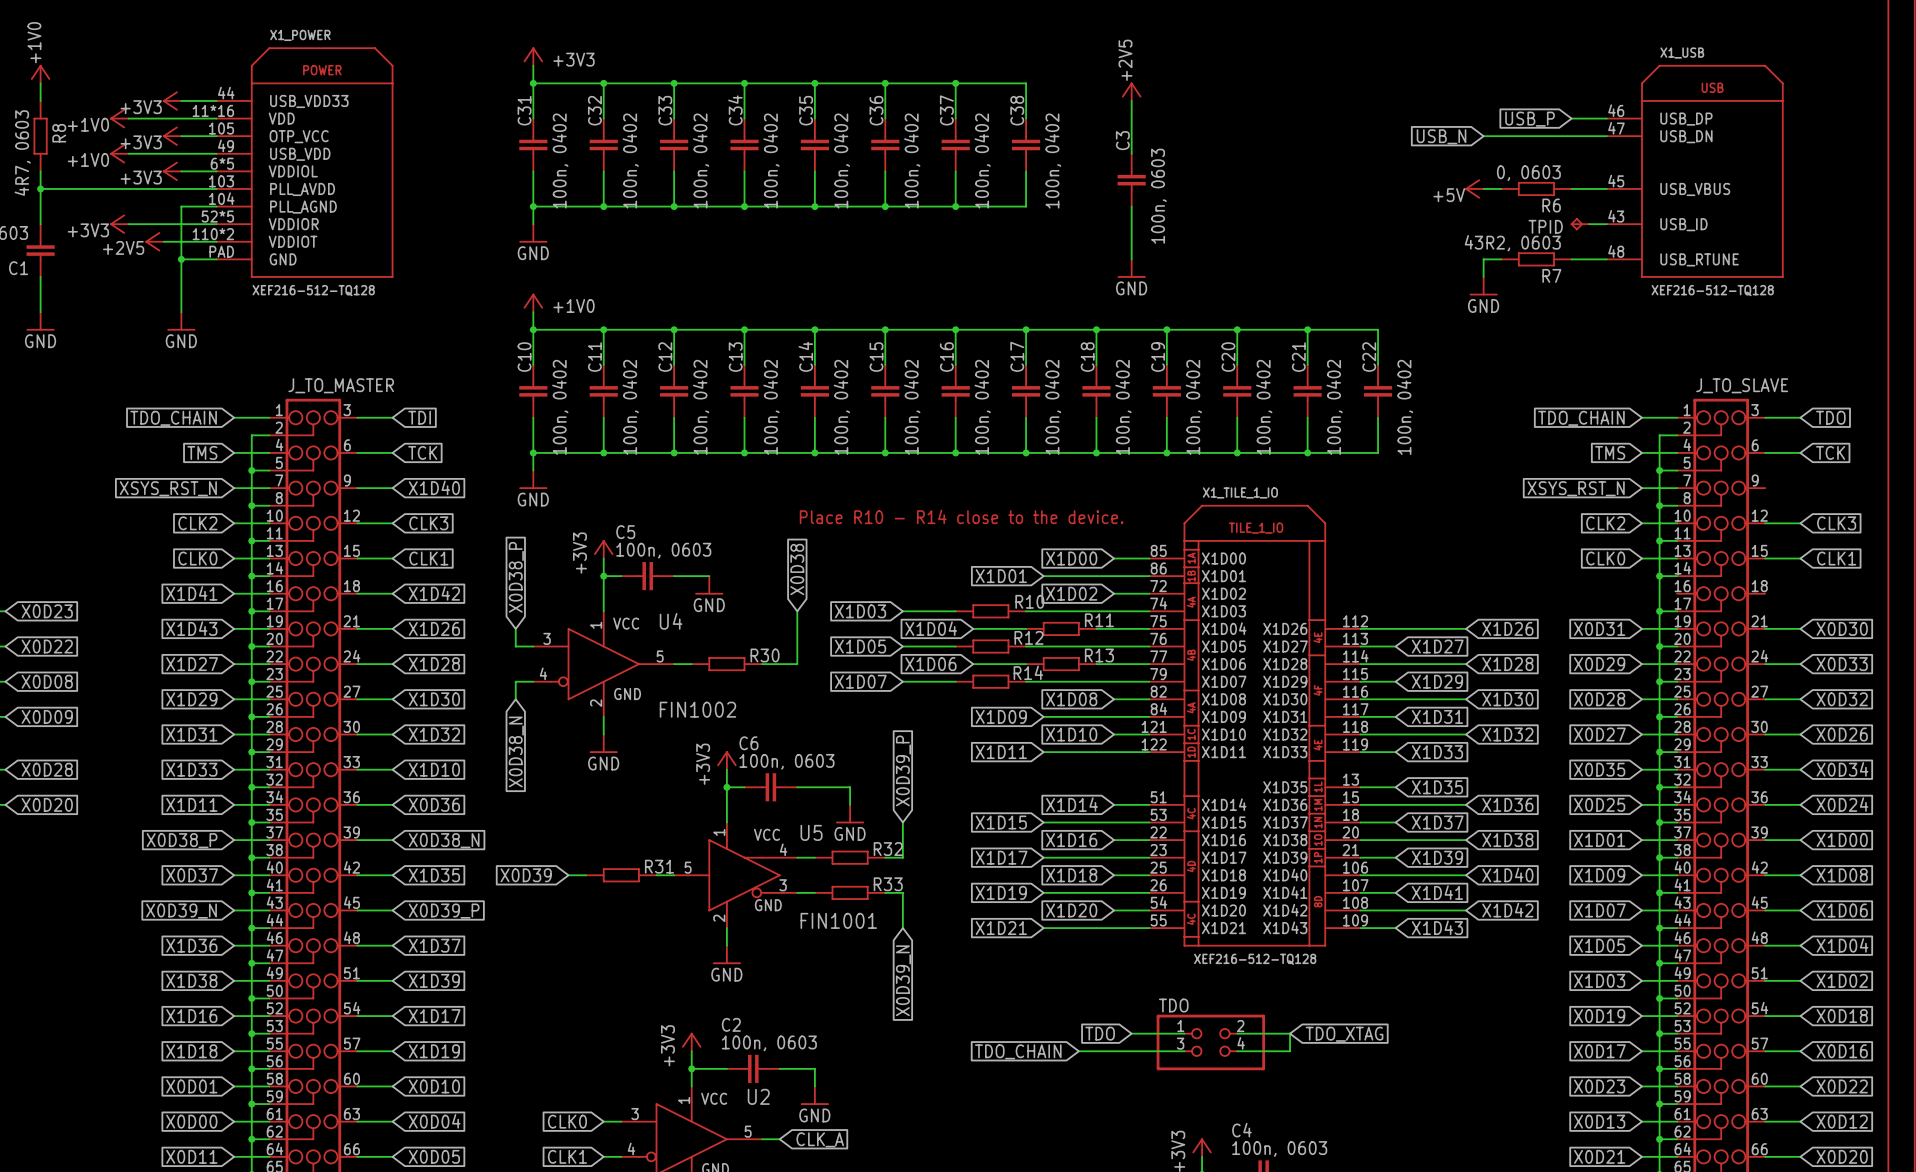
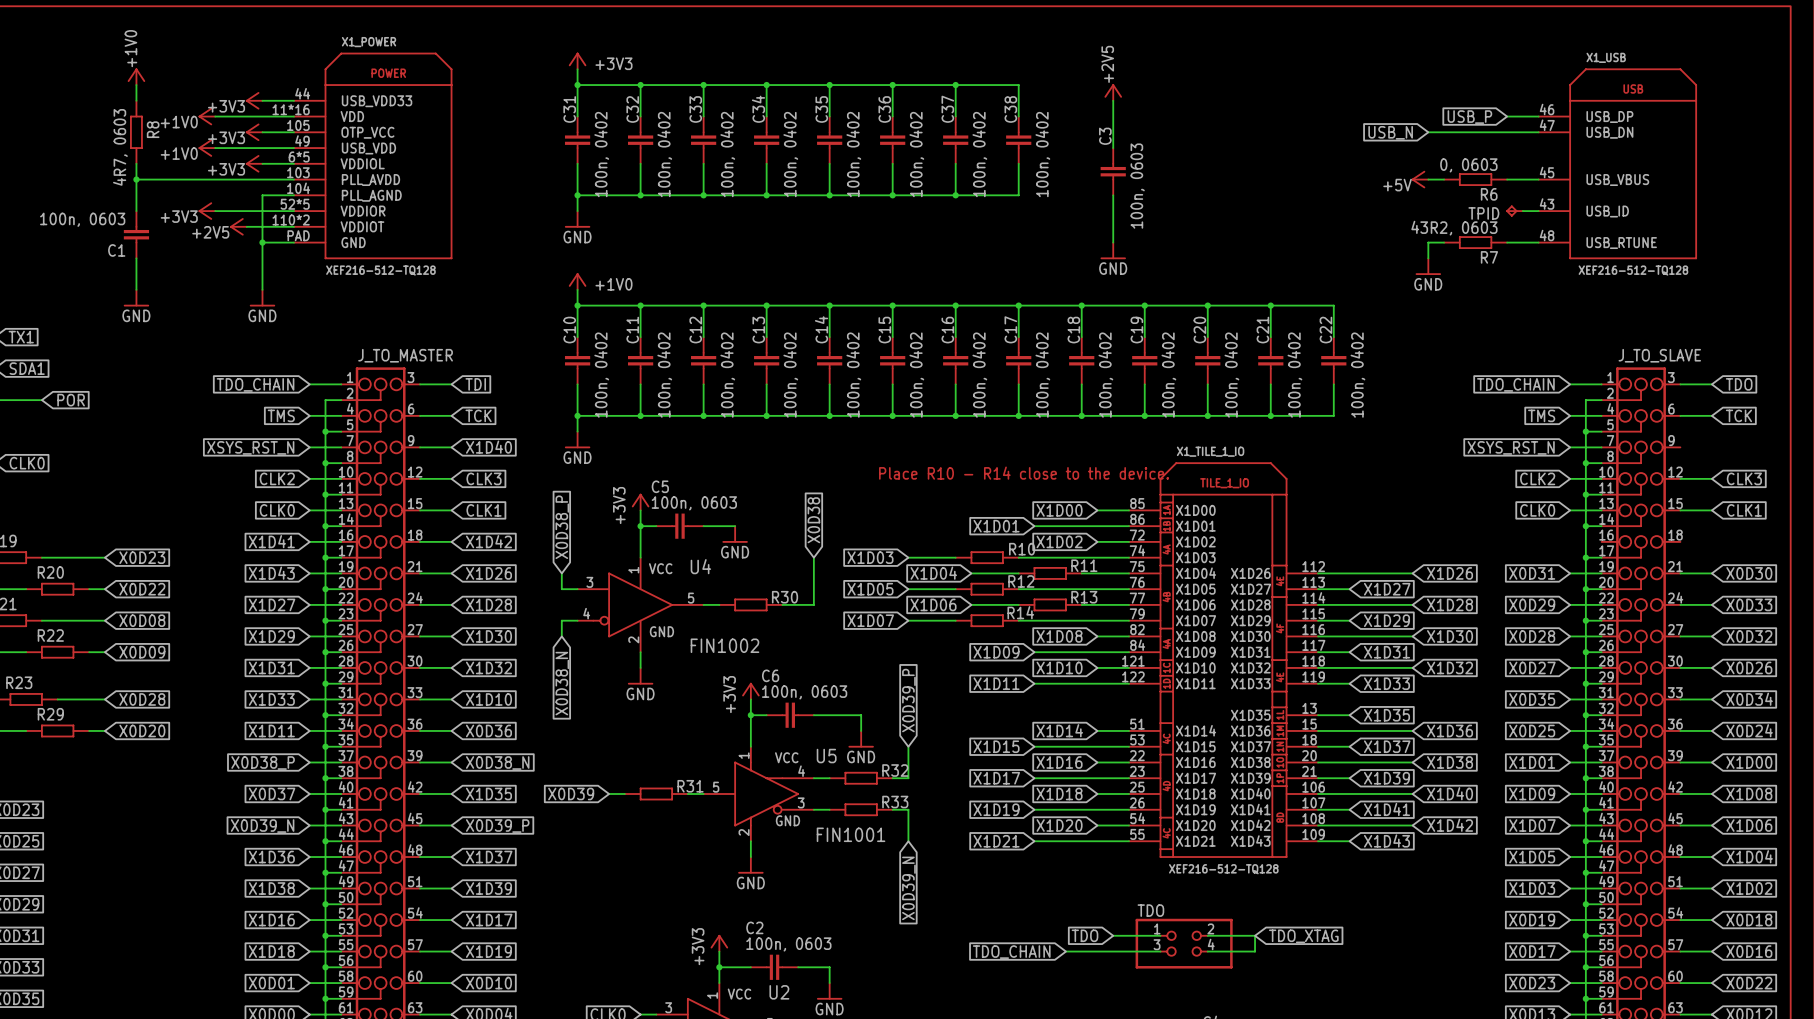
text position: Place R10 - R14 close to the device. (961, 516) -> Place R10 - R14 close to the device. (1024, 473)

